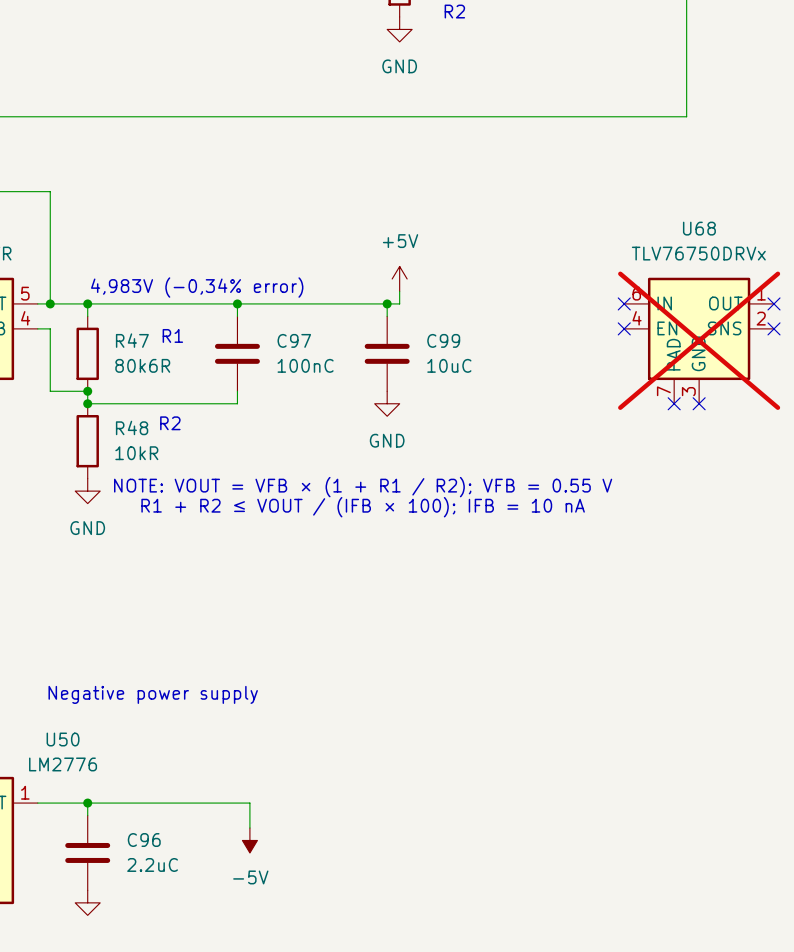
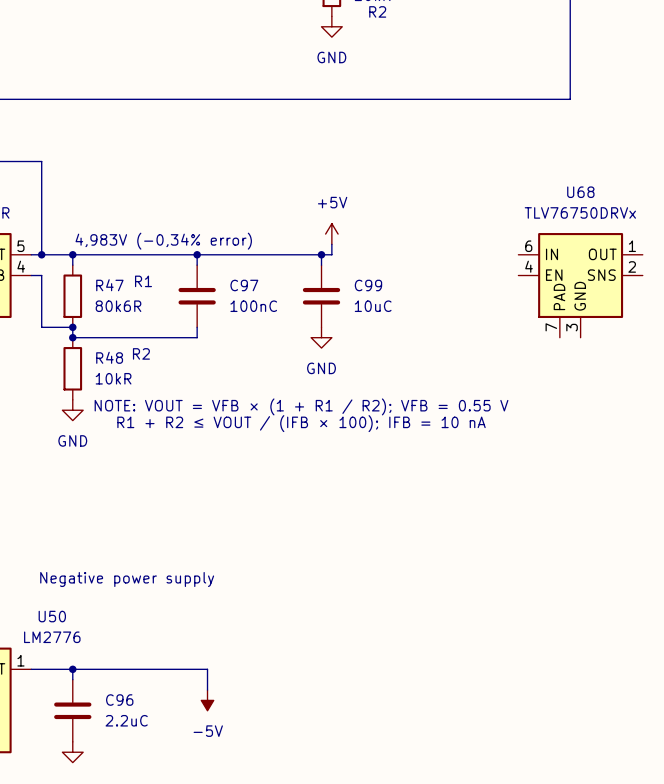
no-connect mark: (624, 303) -> none
no-connect mark: (773, 303) -> none
no-connect mark: (624, 328) -> none
no-connect mark: (773, 328) -> none
U68 do-not-place cross: (699, 340) -> none
no-connect mark: (674, 403) -> none
no-connect mark: (699, 403) -> none

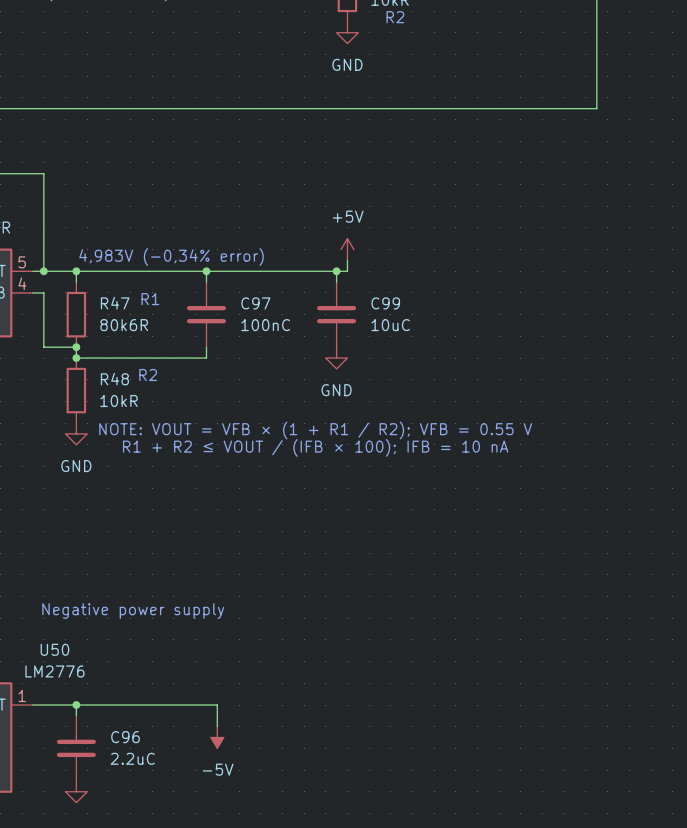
U68: TLV76750DRVx (580, 285) -> none

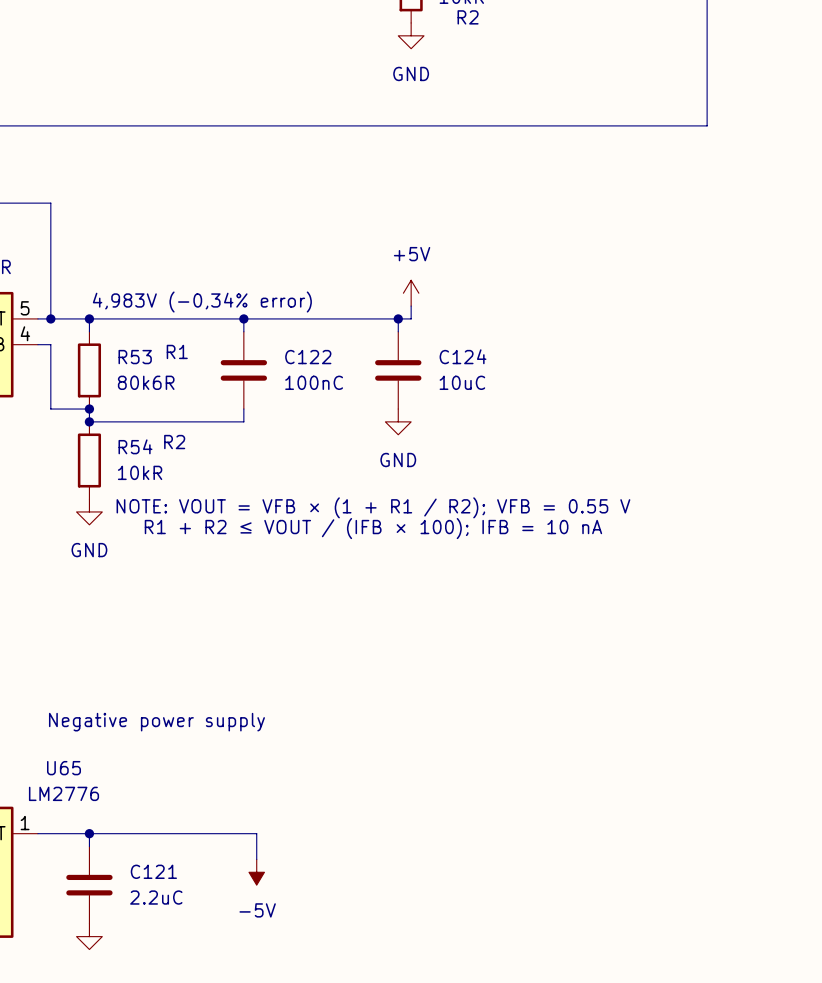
R47 name: R47 (115, 303) -> R53 (135, 357)
C97 name: C97 (255, 303) -> C122 (308, 357)
C99 name: C99 (385, 303) -> C124 (463, 356)
R48 name: R48 (114, 379) -> R54 (135, 446)
U50 name: U50 (54, 649) -> U65 (64, 768)
C96 name: C96 (125, 737) -> C121 (153, 871)

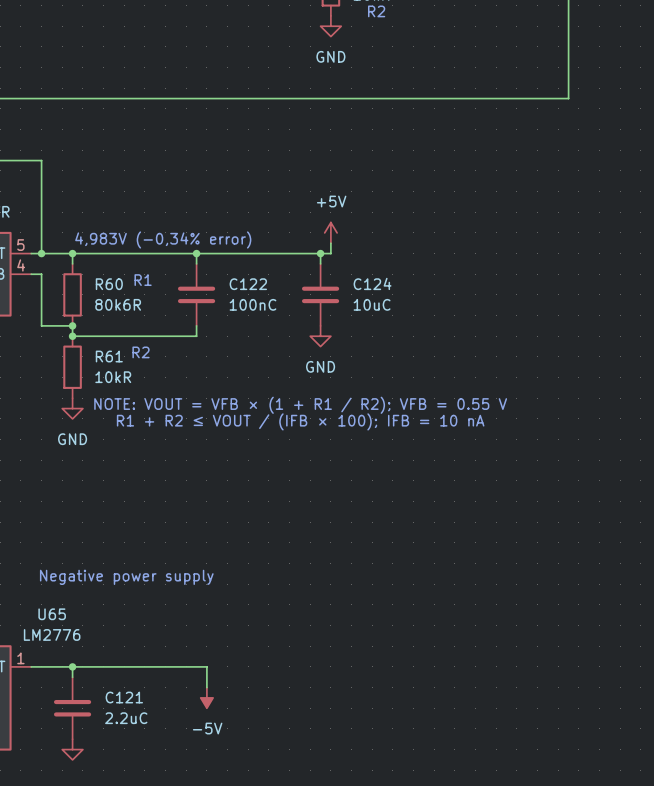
R53 name: R53 (135, 357) -> R60 (109, 284)
R54 name: R54 (135, 446) -> R61 (109, 356)

